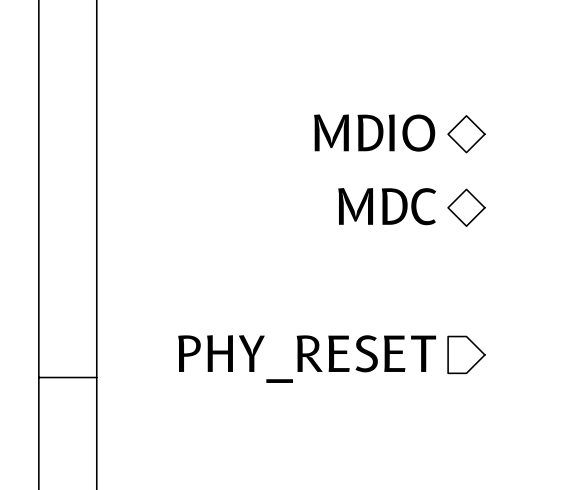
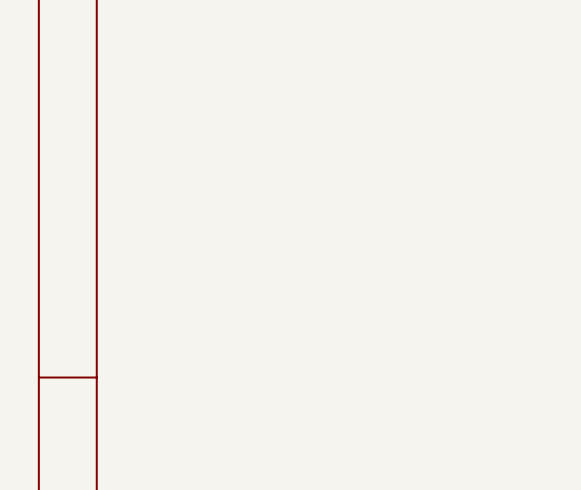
hierarchical label: MDIO (374, 133) -> none
hierarchical label: MDC (387, 206) -> none
hierarchical label: PHY_RESET (307, 359) -> none

